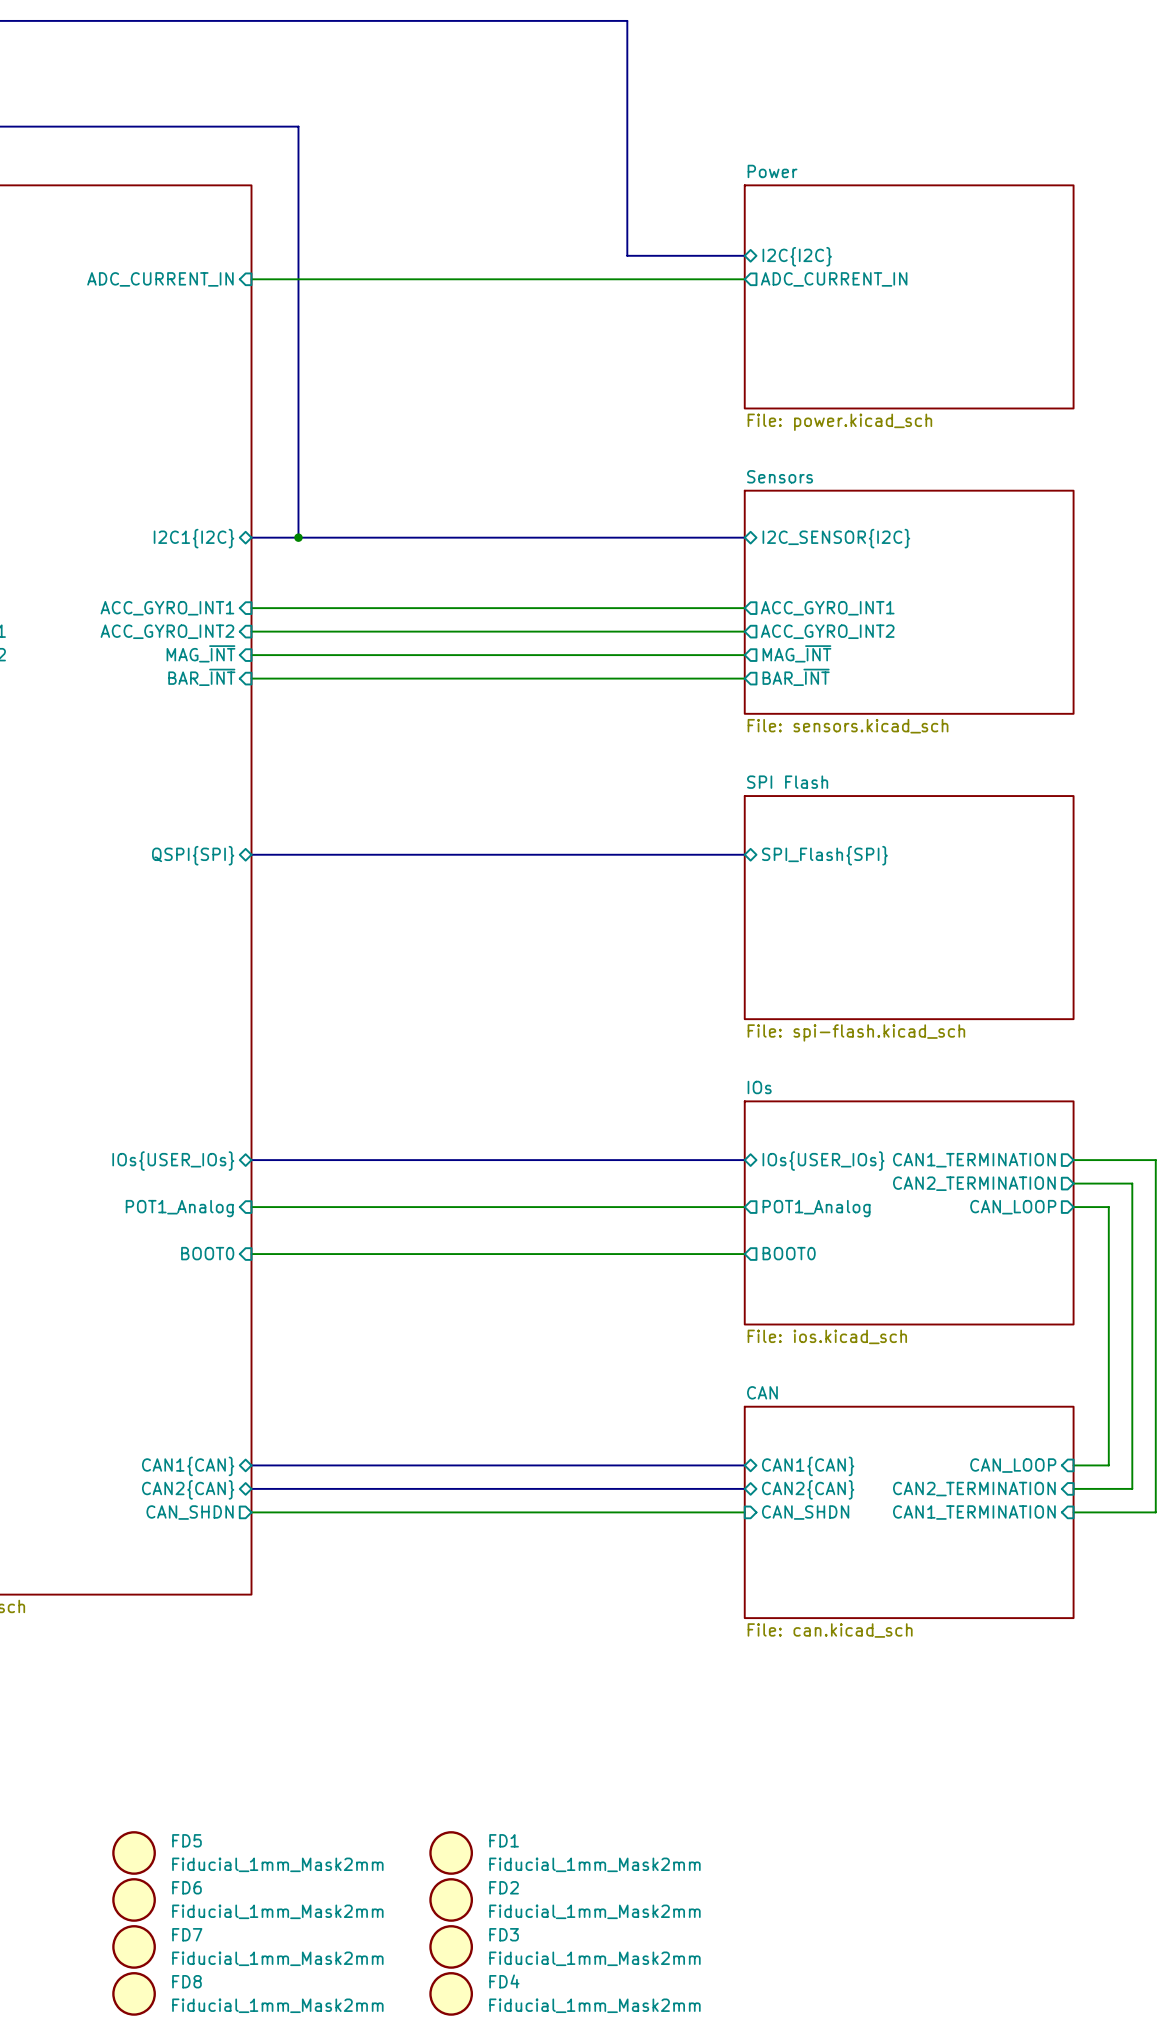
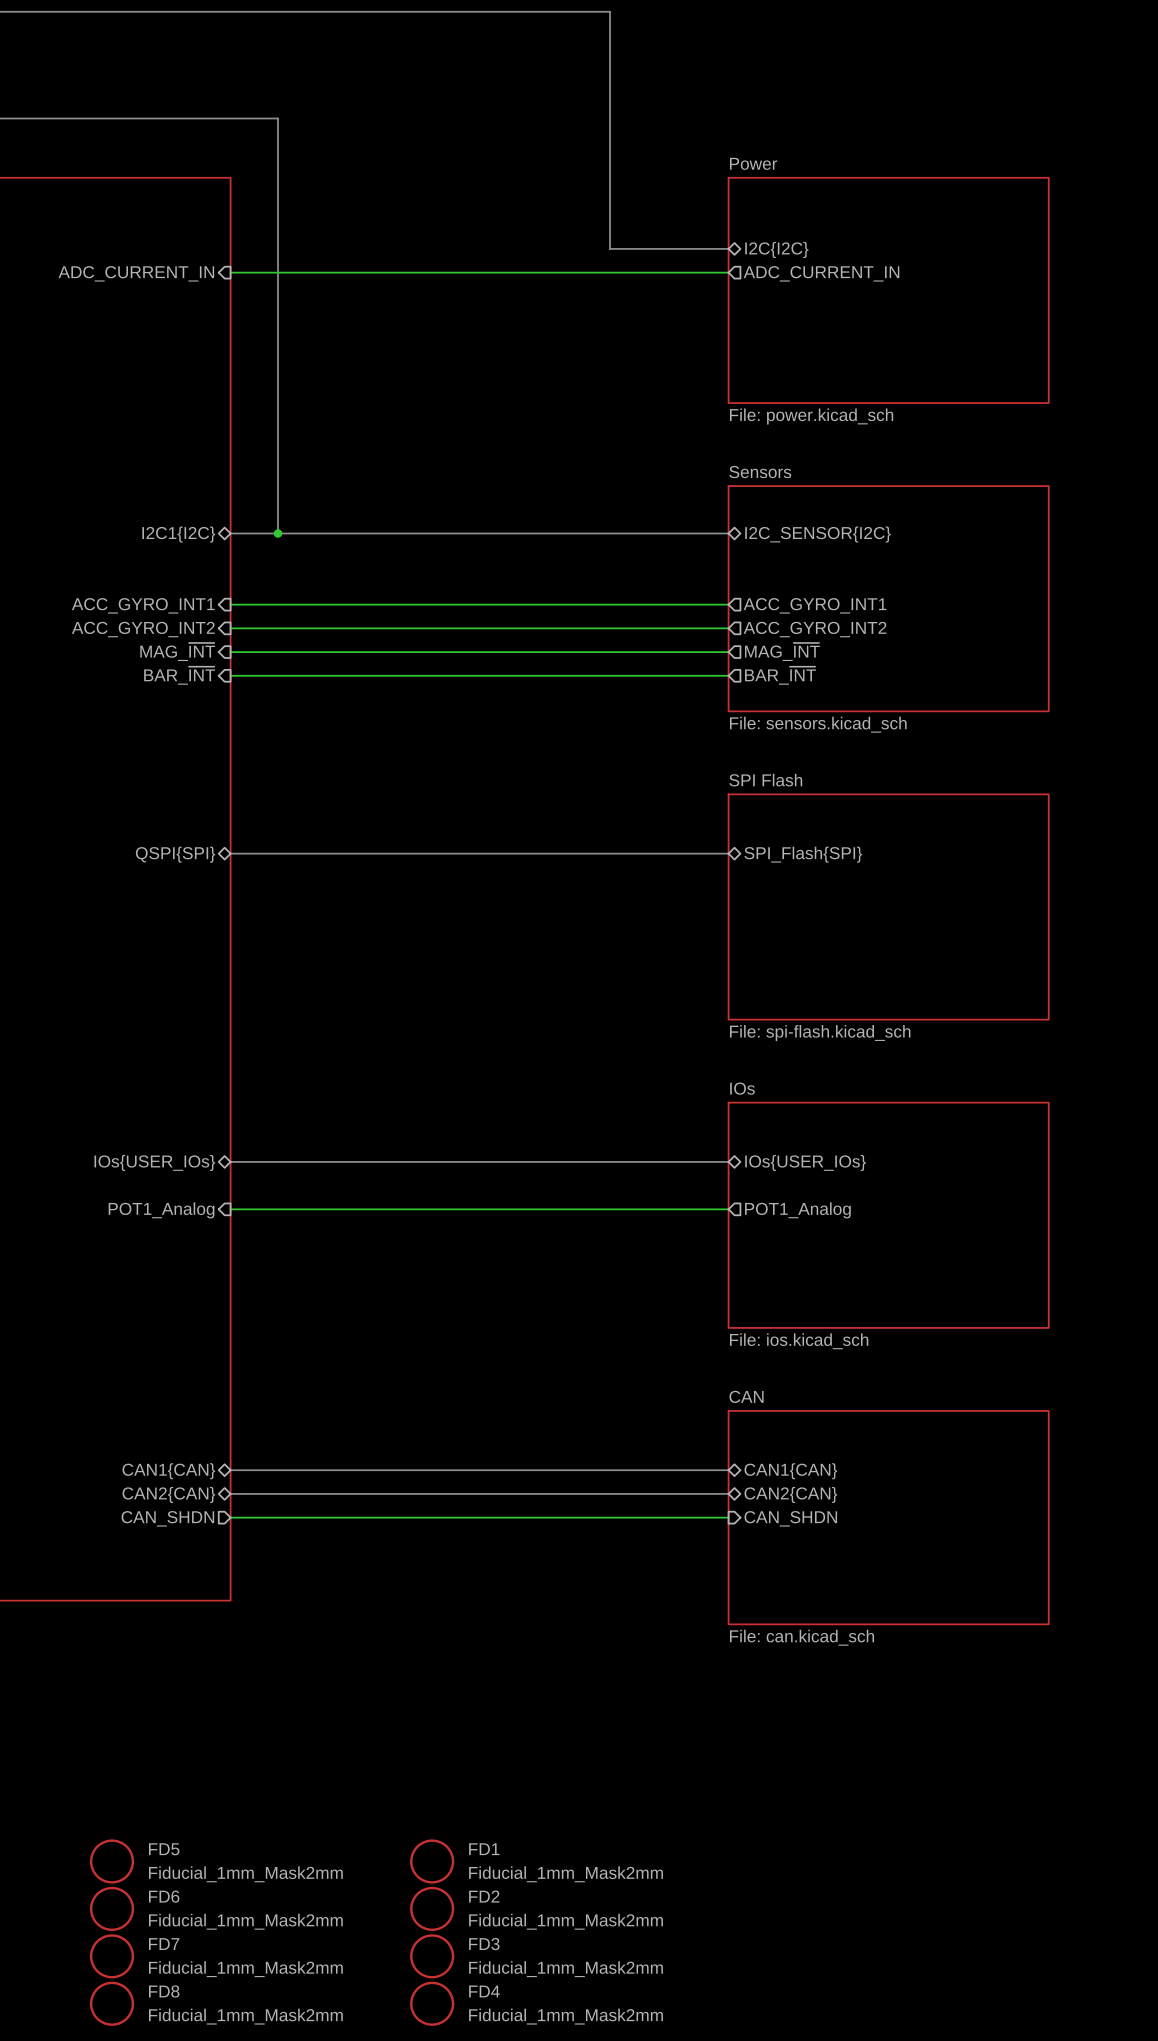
sheet Power shape: [744, 184, 1075, 410] -> [727, 177, 1050, 404]
sheet Sensors shape: [744, 489, 1075, 715] -> [727, 485, 1050, 713]
sheet SPI Flash shape: [744, 795, 1075, 1020] -> [727, 793, 1050, 1021]
sheet IOs shape: [744, 1100, 1075, 1326] -> [727, 1101, 1050, 1329]
sheet pin: CAN1_TERMINATION (974, 1160) -> none
wire: (1073, 1160) (1155, 1160) (1155, 1512) (1073, 1512) -> none
sheet pin: CAN2_TERMINATION (974, 1183) -> none
wire: (1073, 1183) (1132, 1183) (1132, 1488) (1073, 1488) -> none
sheet pin: CAN_LOOP (1013, 1207) -> none
wire: (1073, 1207) (1108, 1207) (1108, 1465) (1073, 1465) -> none
sheet pin: BOOT0 (207, 1253) -> none
sheet pin: BOOT0 (789, 1253) -> none
wire: (251, 1254) (744, 1254) -> none
sheet CAN shape: [744, 1406, 1075, 1619] -> [727, 1410, 1050, 1626]
sheet pin: CAN_LOOP (1013, 1465) -> none
sheet pin: CAN2_TERMINATION (974, 1489) -> none
sheet pin: CAN1_TERMINATION (974, 1512) -> none

